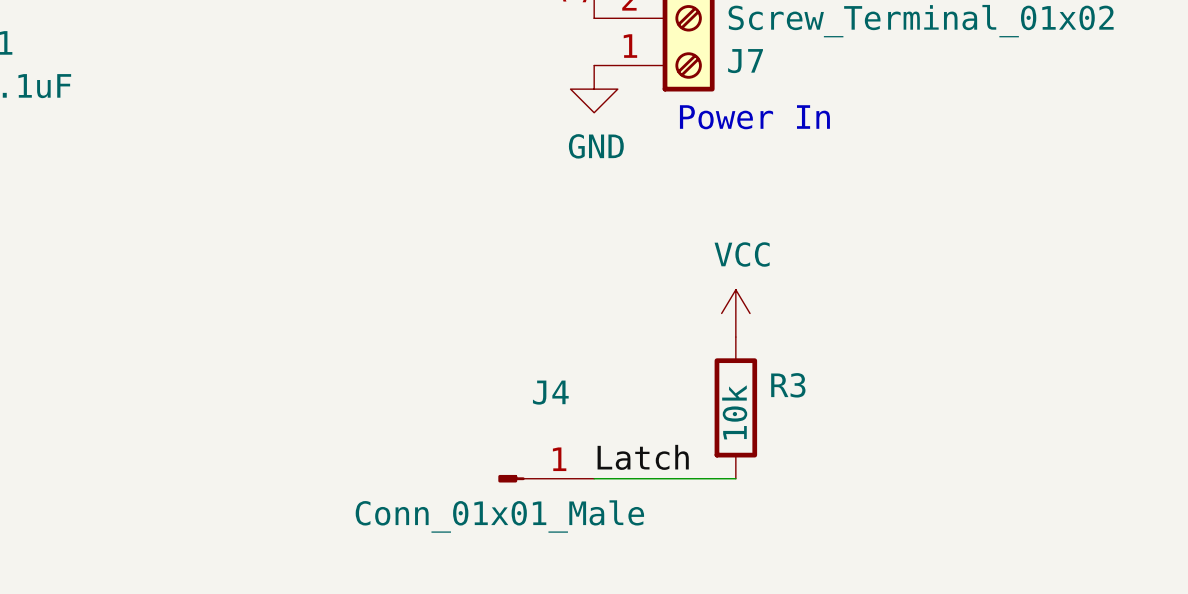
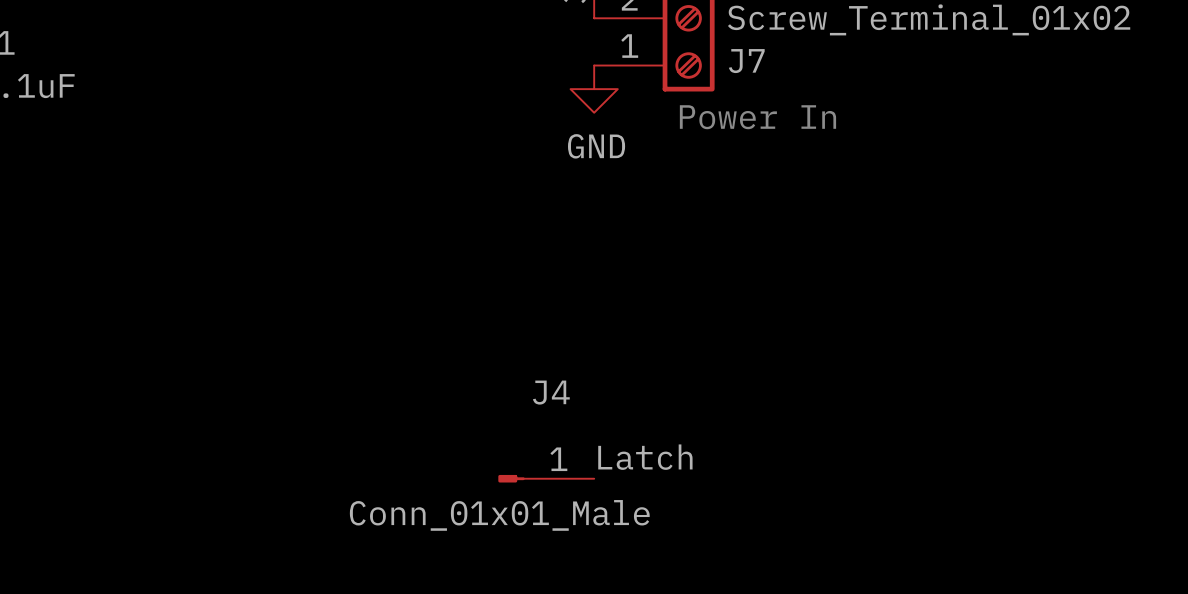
power symbol: VCC (735, 313) -> none
R3: 10k (735, 407) -> none
wire: (594, 478) (735, 478) -> none

